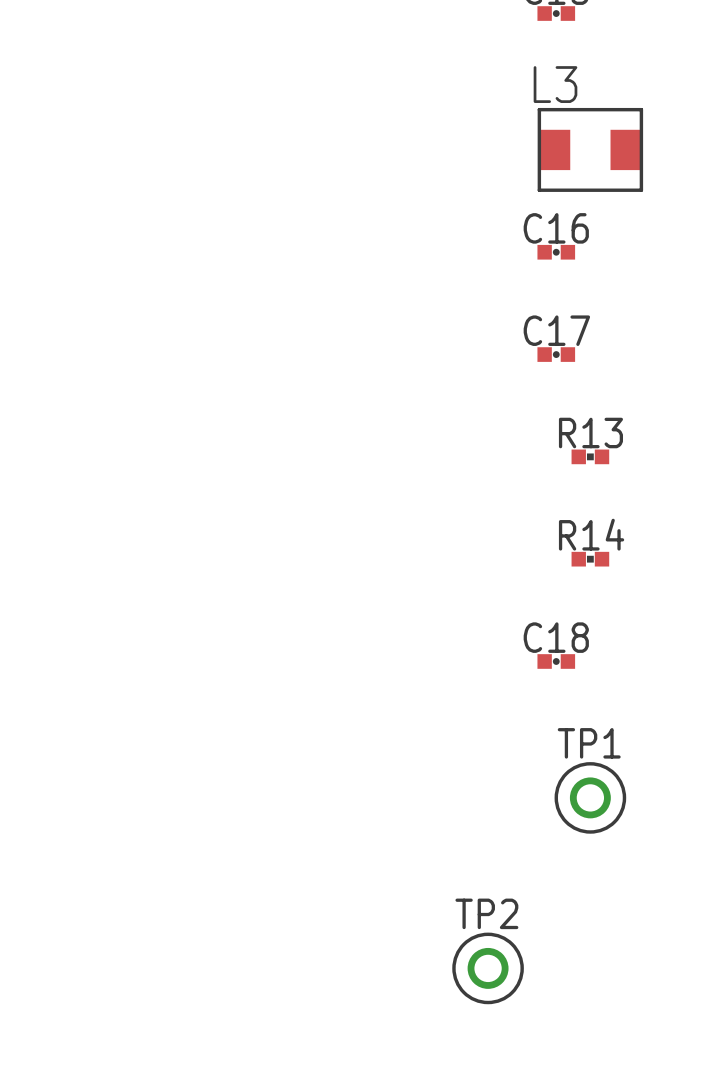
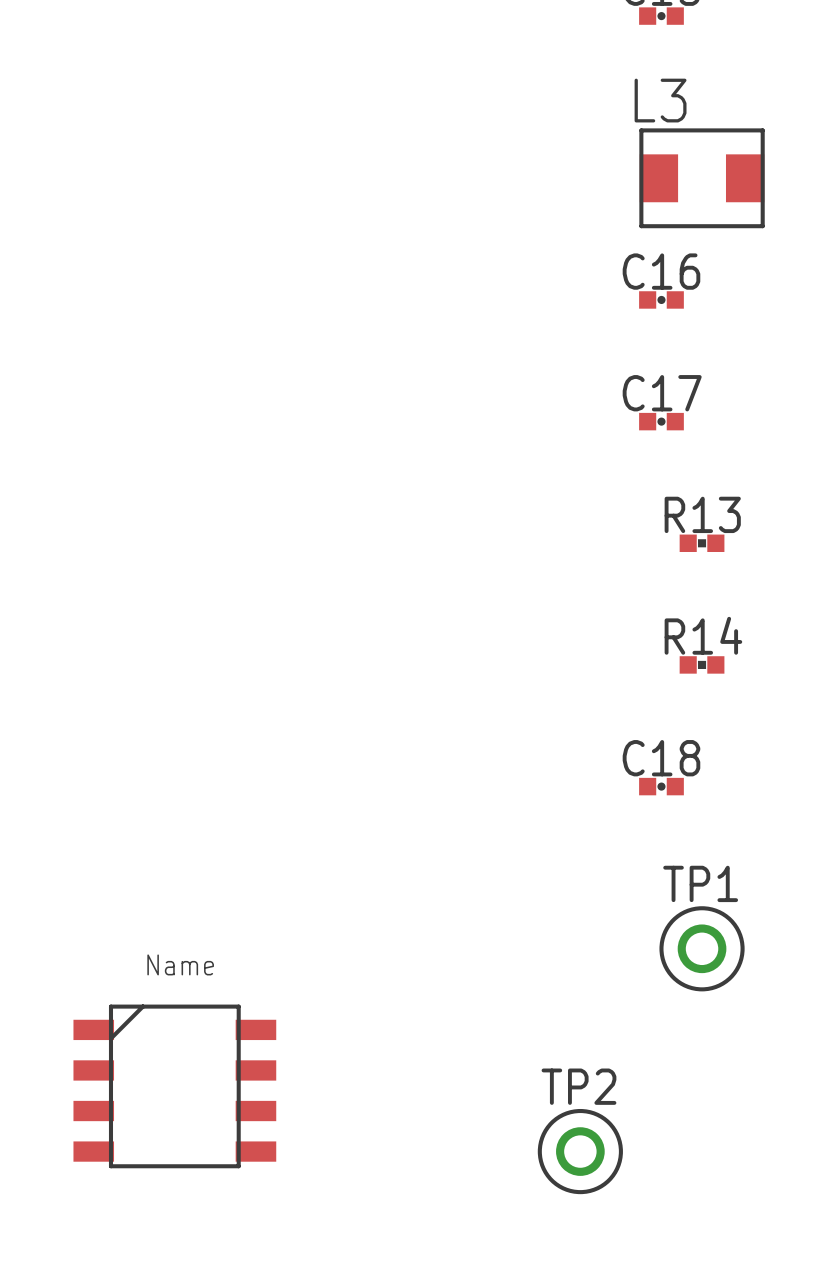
part: none -> (174, 1086)

